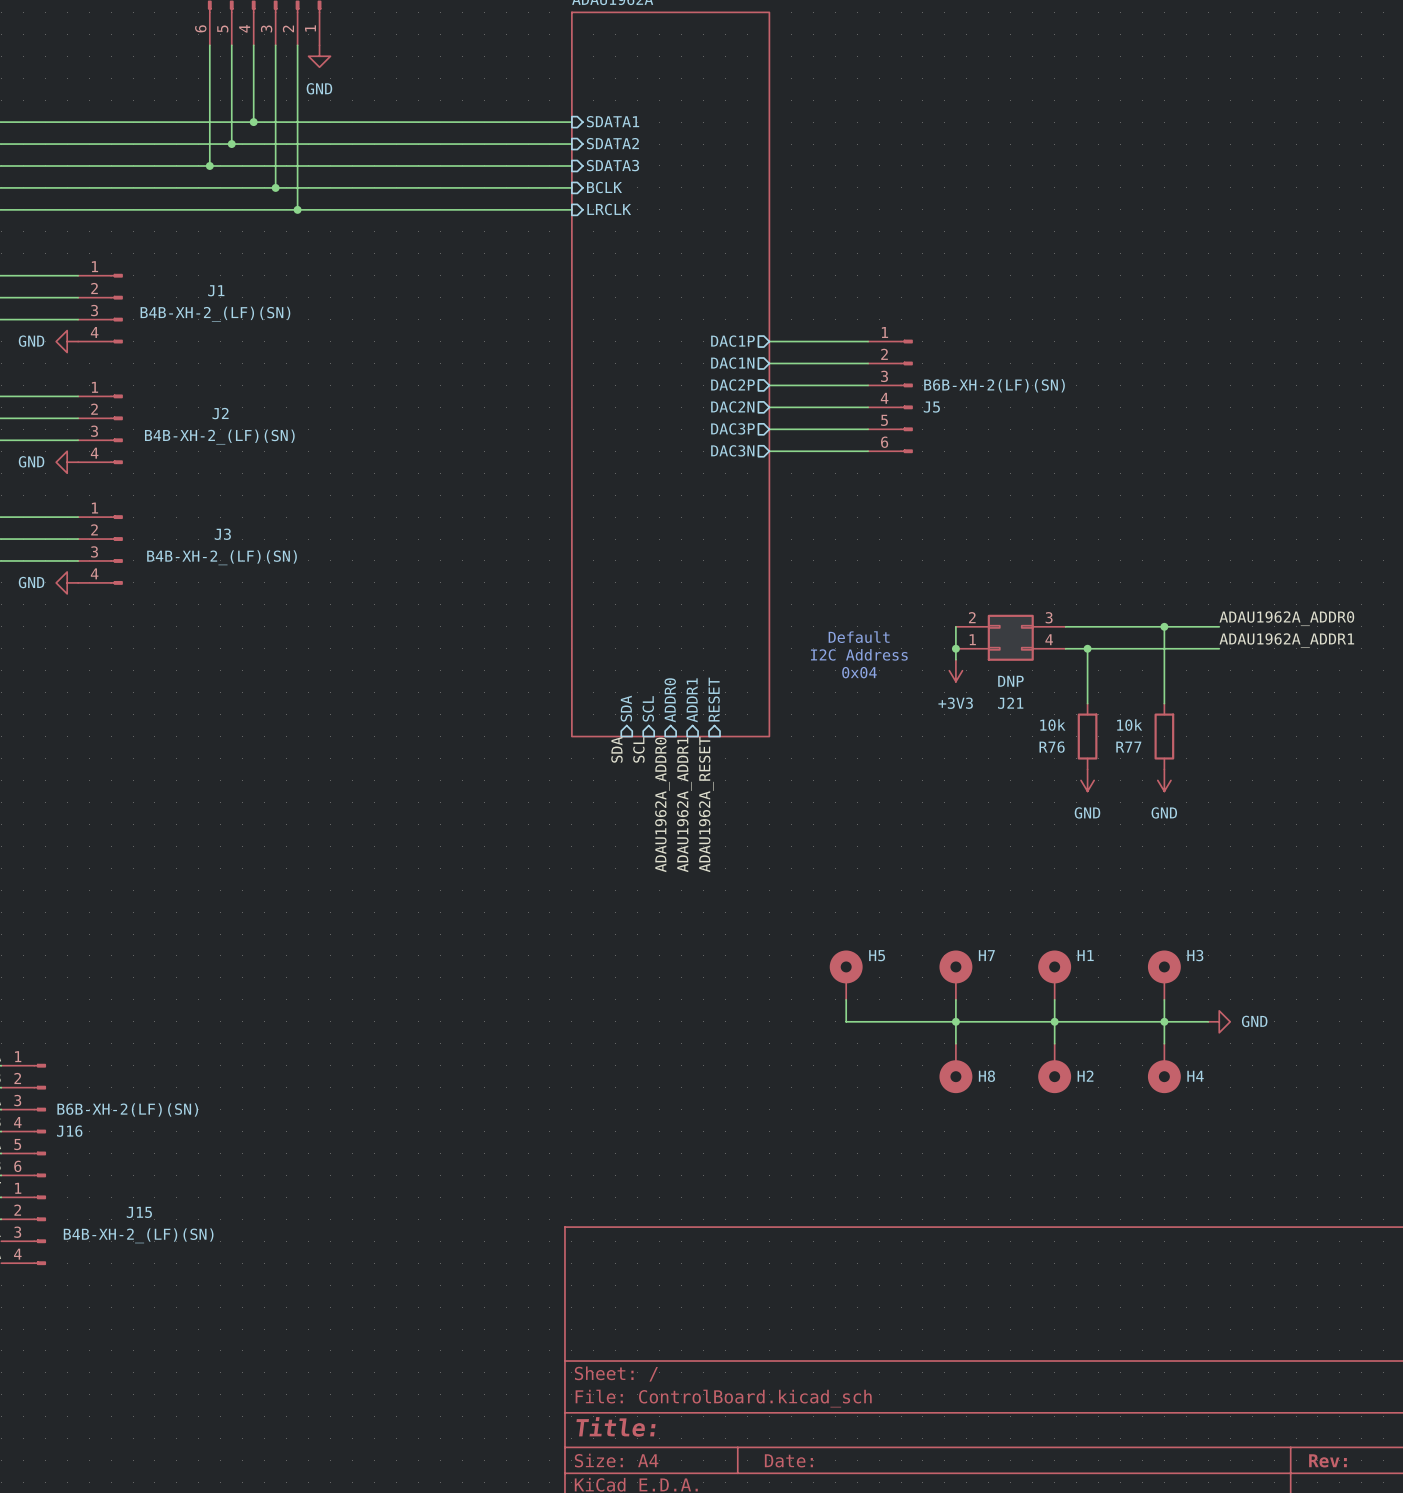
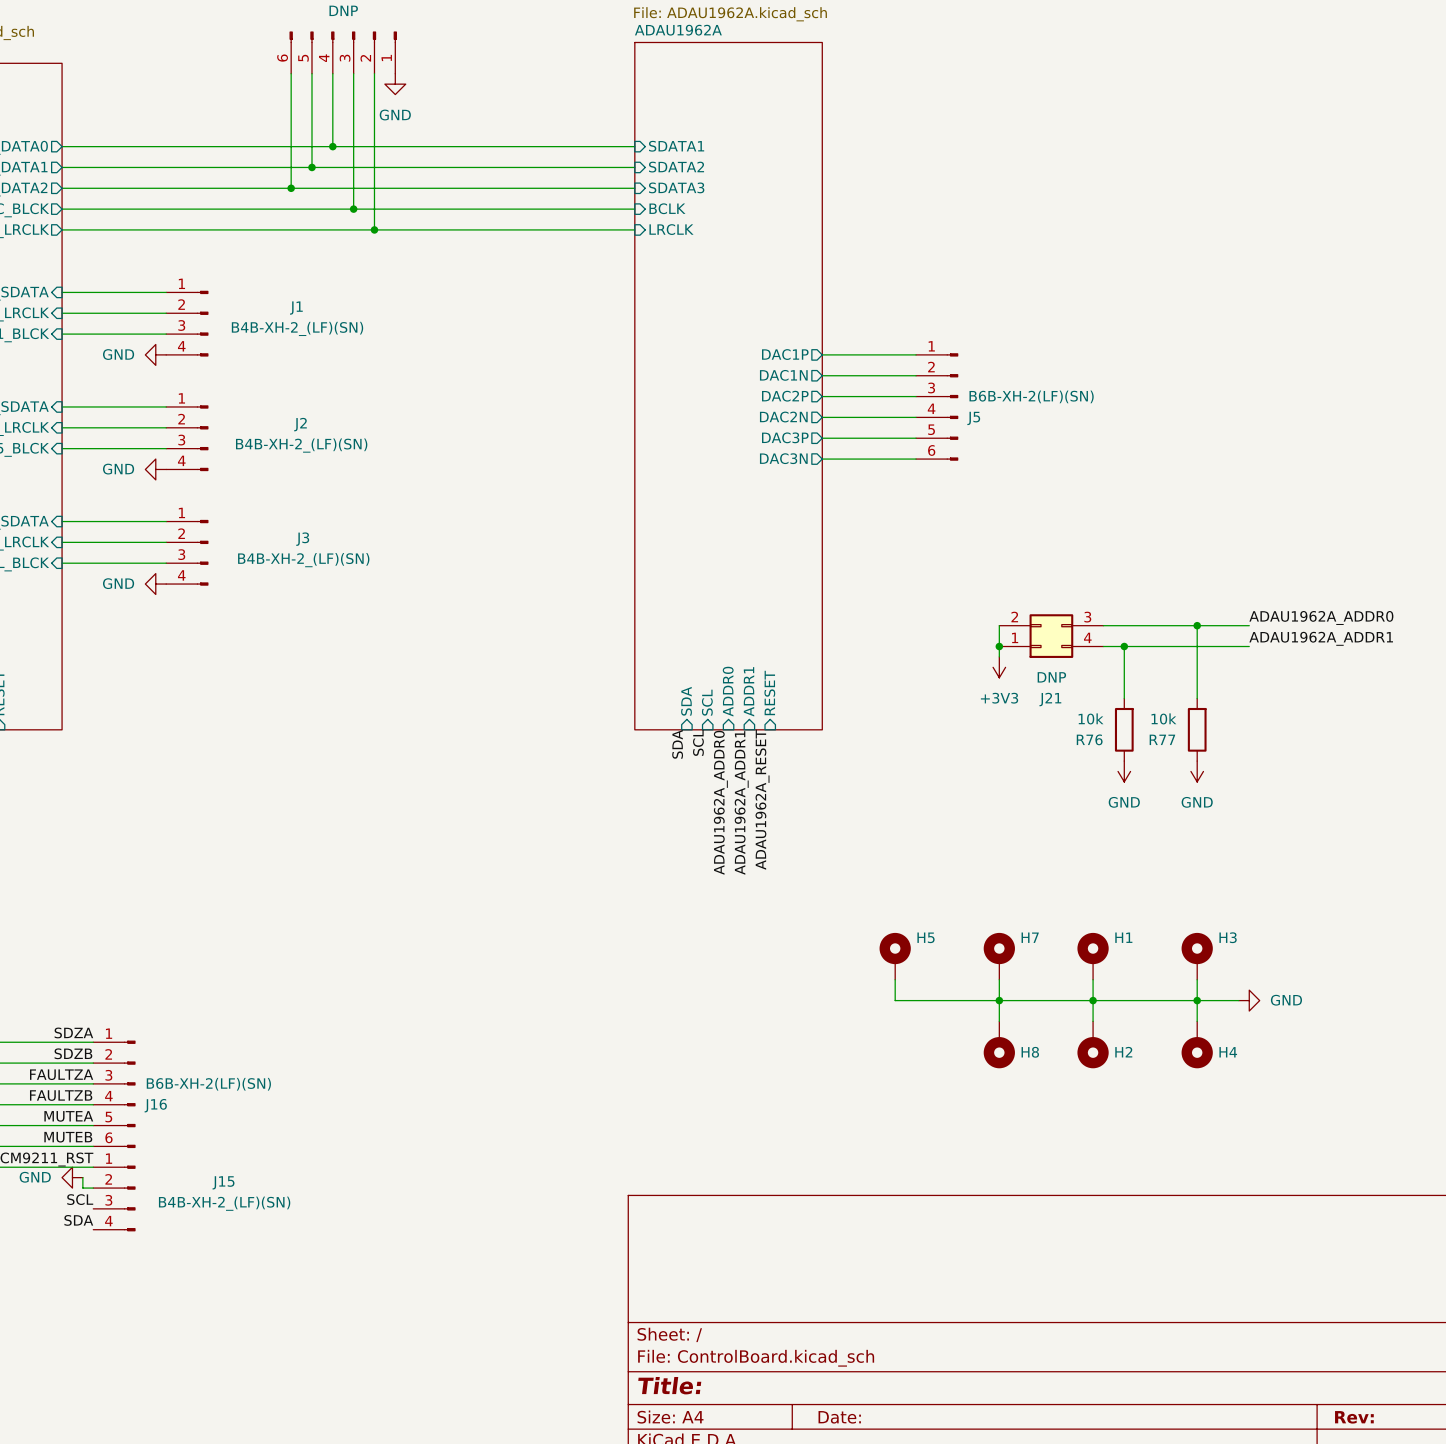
text: Default (859, 637) -> none
text: I2C Address (859, 654) -> none
text: 0x04 (859, 672) -> none

